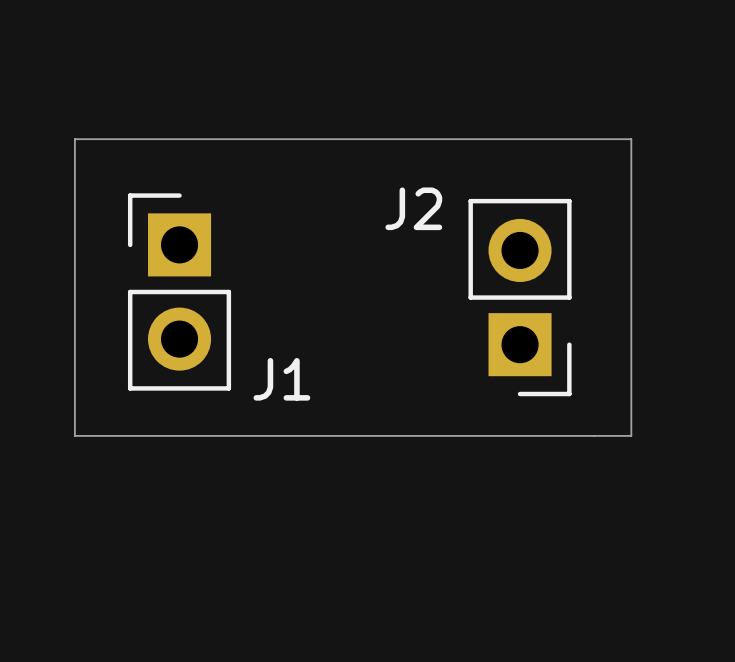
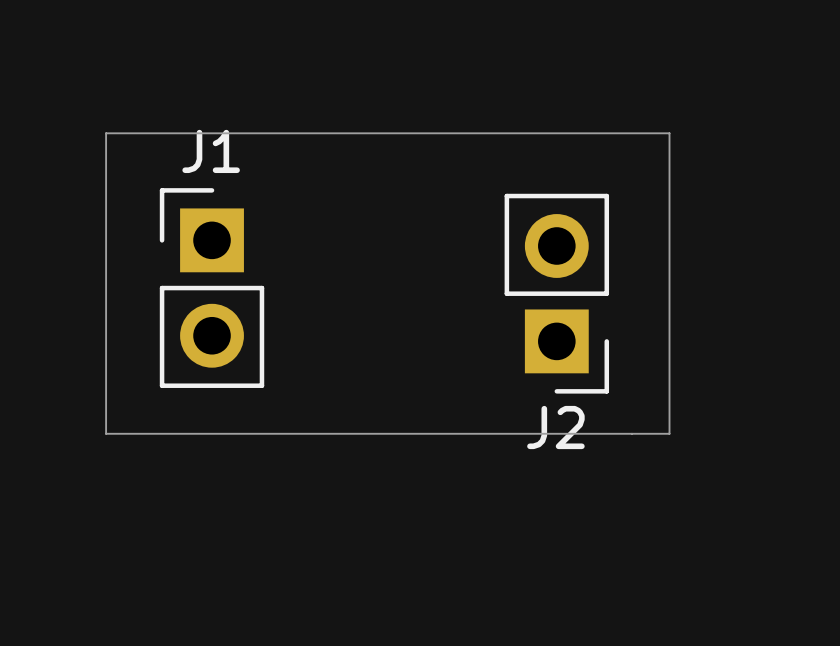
J2 name position: J2 (413, 208) -> J2 (555, 427)
J1 name position: J1 (281, 379) -> J1 (211, 151)

